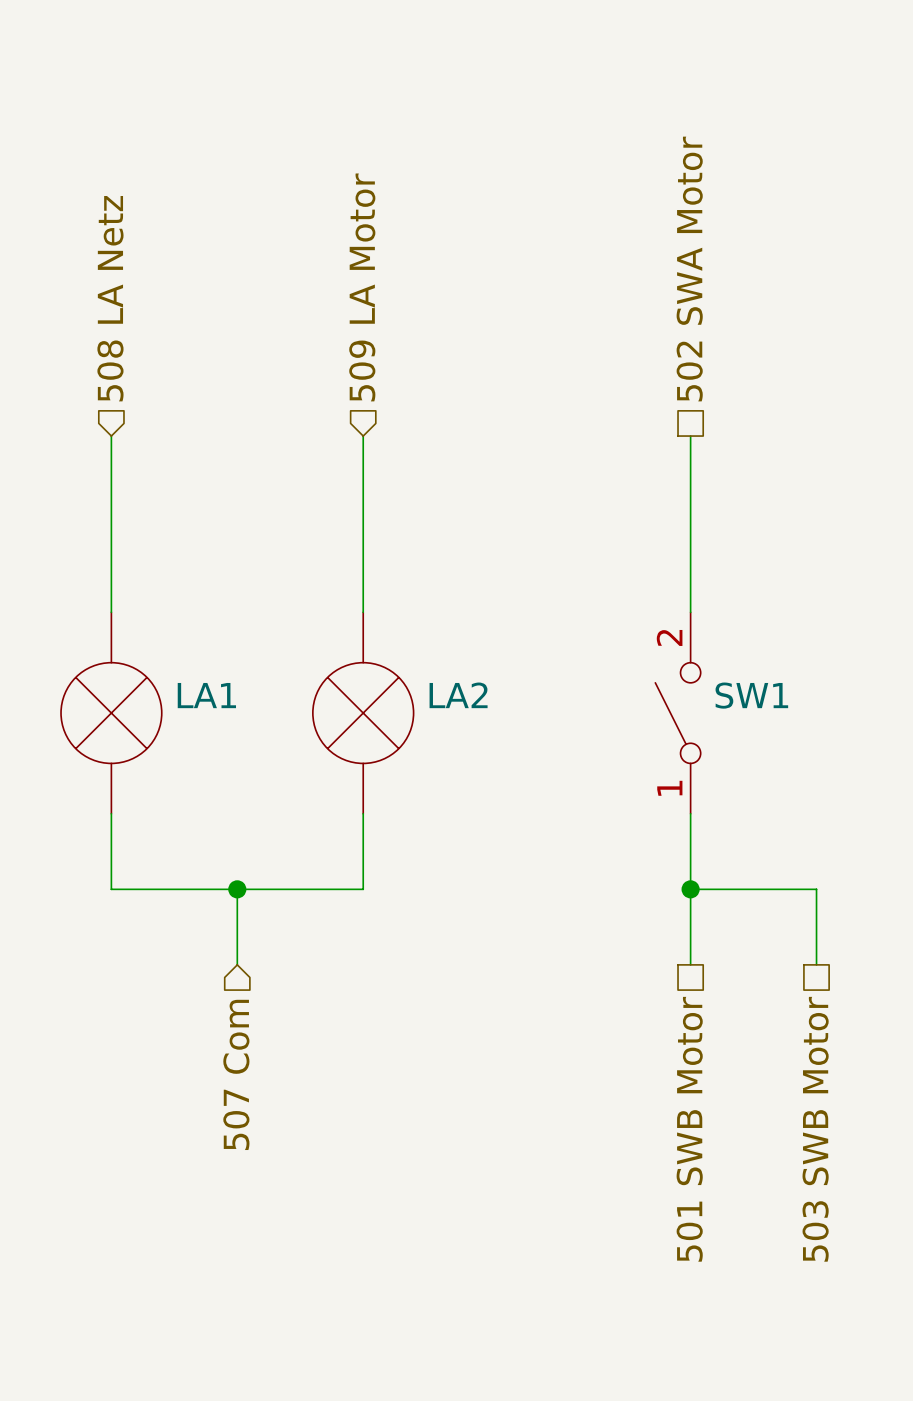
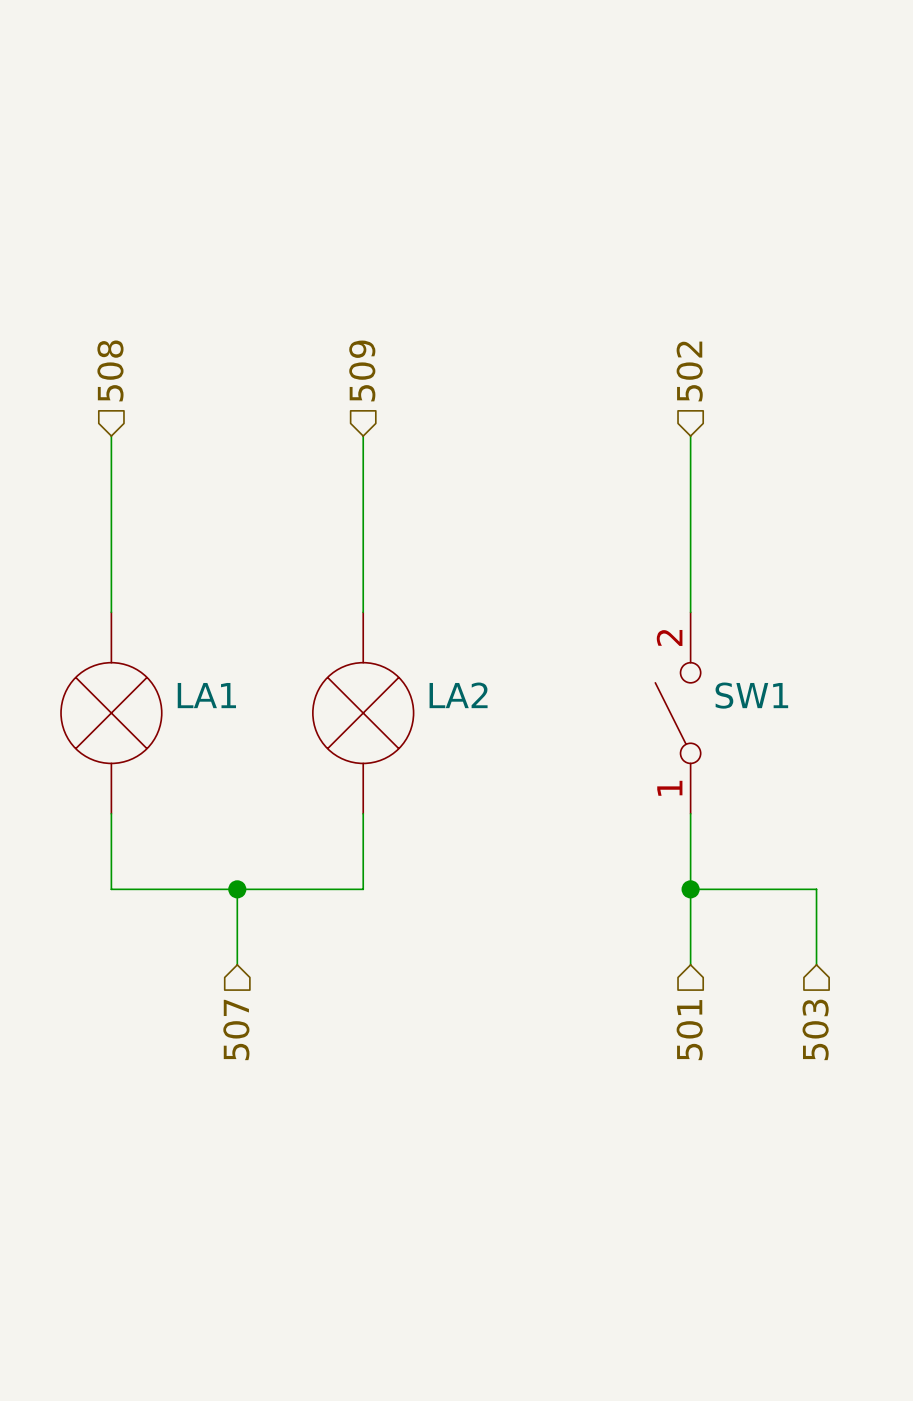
hierarchical label shape: passive (689, 269) -> input (689, 371)
hierarchical label: 502 SWA Motor (689, 269) -> 502 (689, 371)
hierarchical label: 509 LA Motor (362, 287) -> 509 (362, 370)
hierarchical label: 508 LA Netz (110, 298) -> 508 (110, 370)
hierarchical label: 507 Com (236, 1074) -> 507 (236, 1029)
hierarchical label shape: passive (689, 1129) -> input (689, 1030)
hierarchical label: 501 SWB Motor (689, 1129) -> 501 (689, 1030)
hierarchical label shape: passive (815, 1129) -> input (815, 1029)
hierarchical label: 503 SWB Motor (815, 1129) -> 503 (815, 1029)

